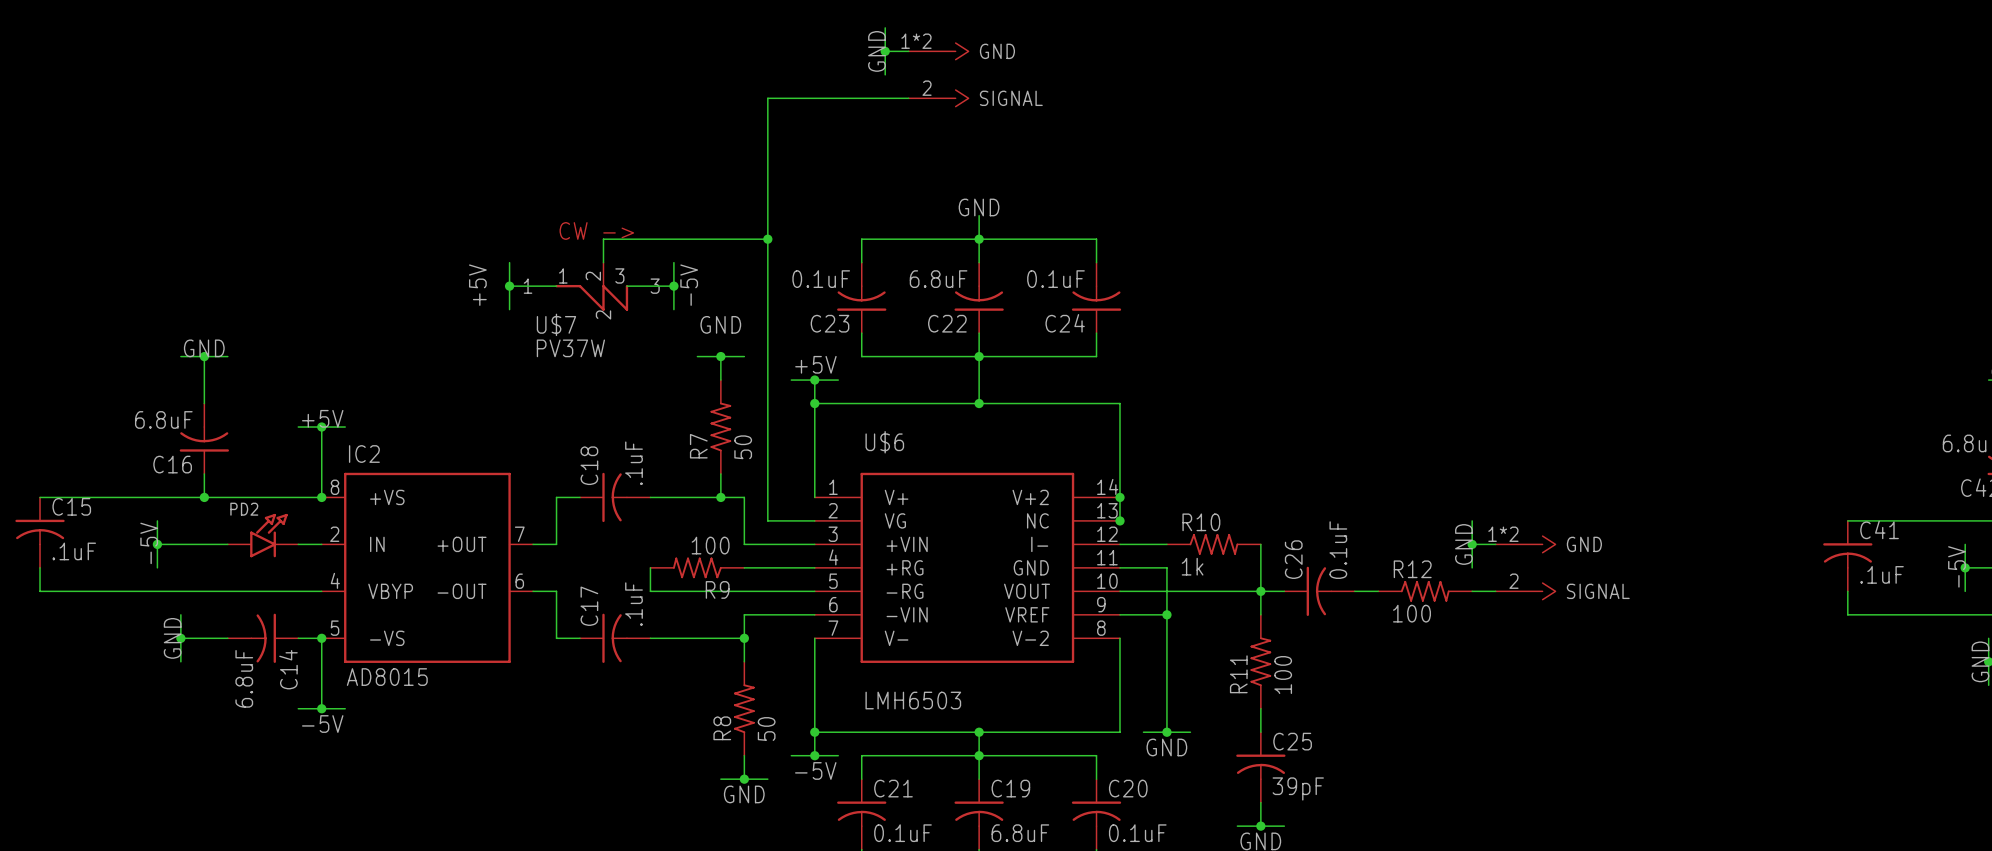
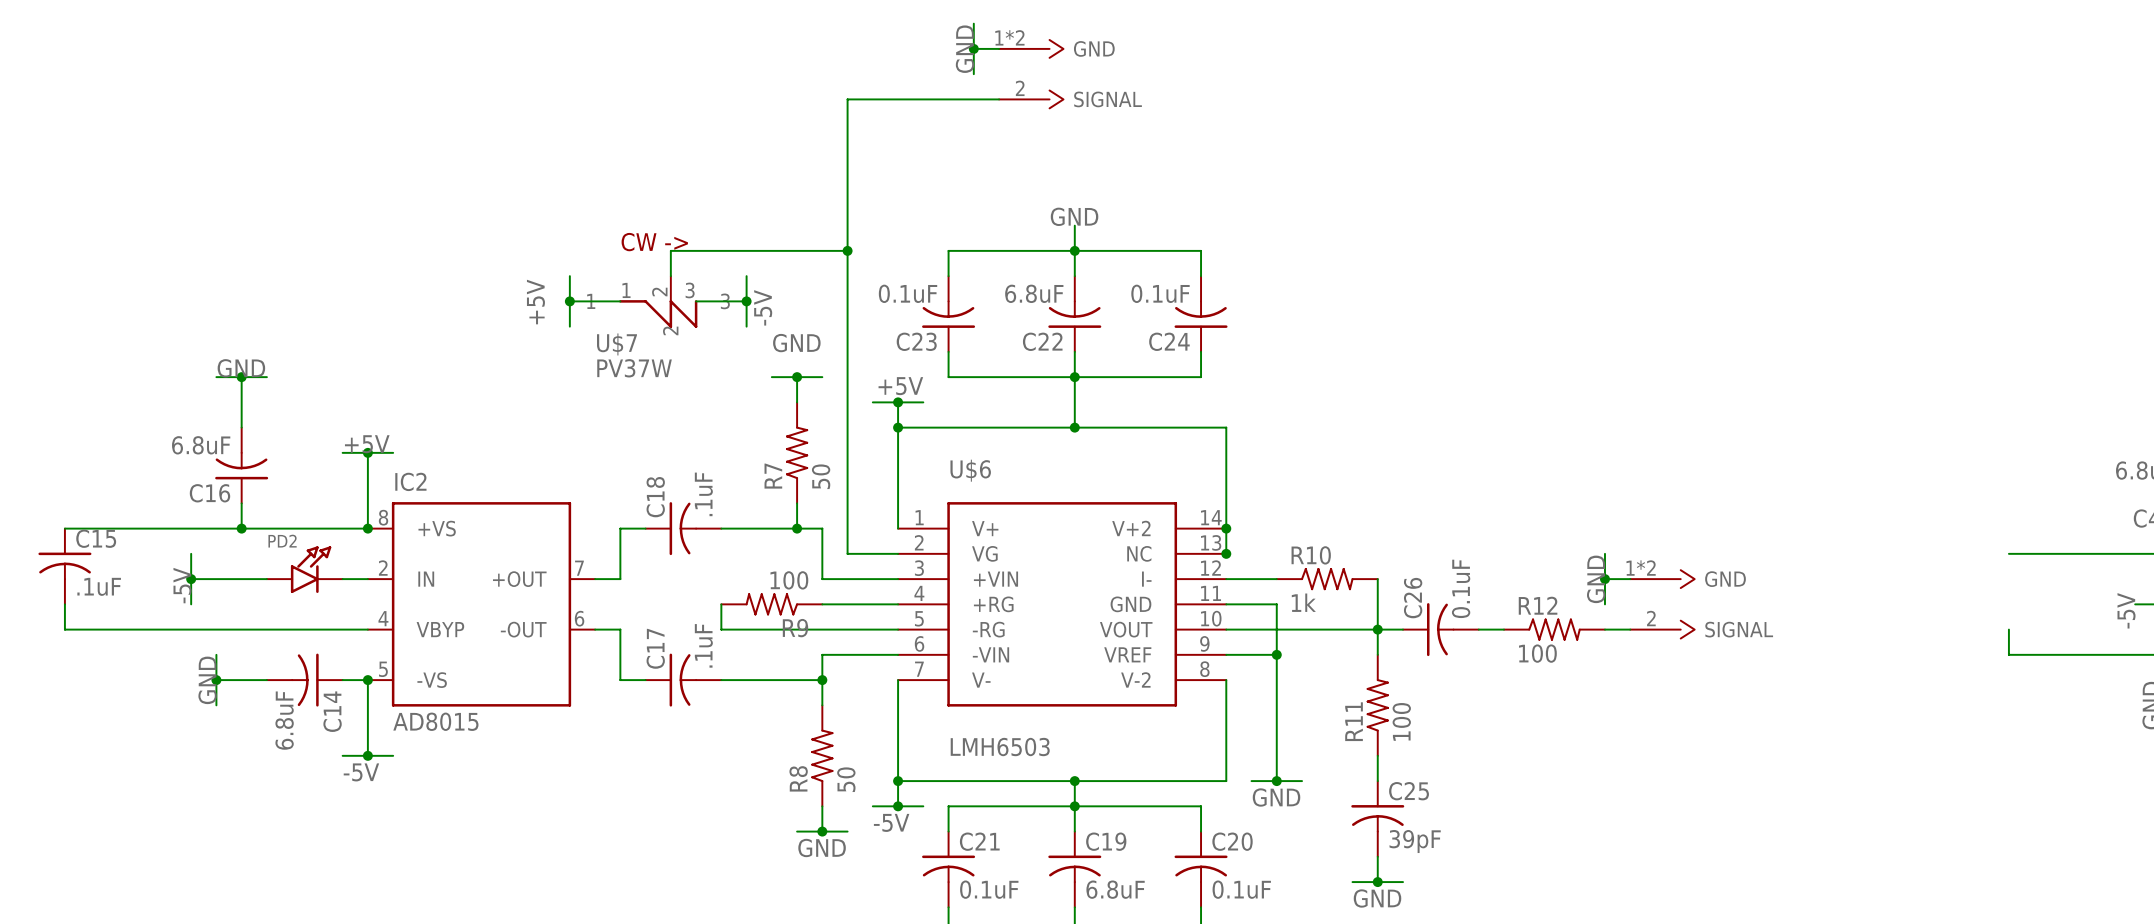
wire: (1965, 544) (1965, 591) -> none
C41: .1uF (1847, 556) -> none
junction: (1965, 567) -> none

